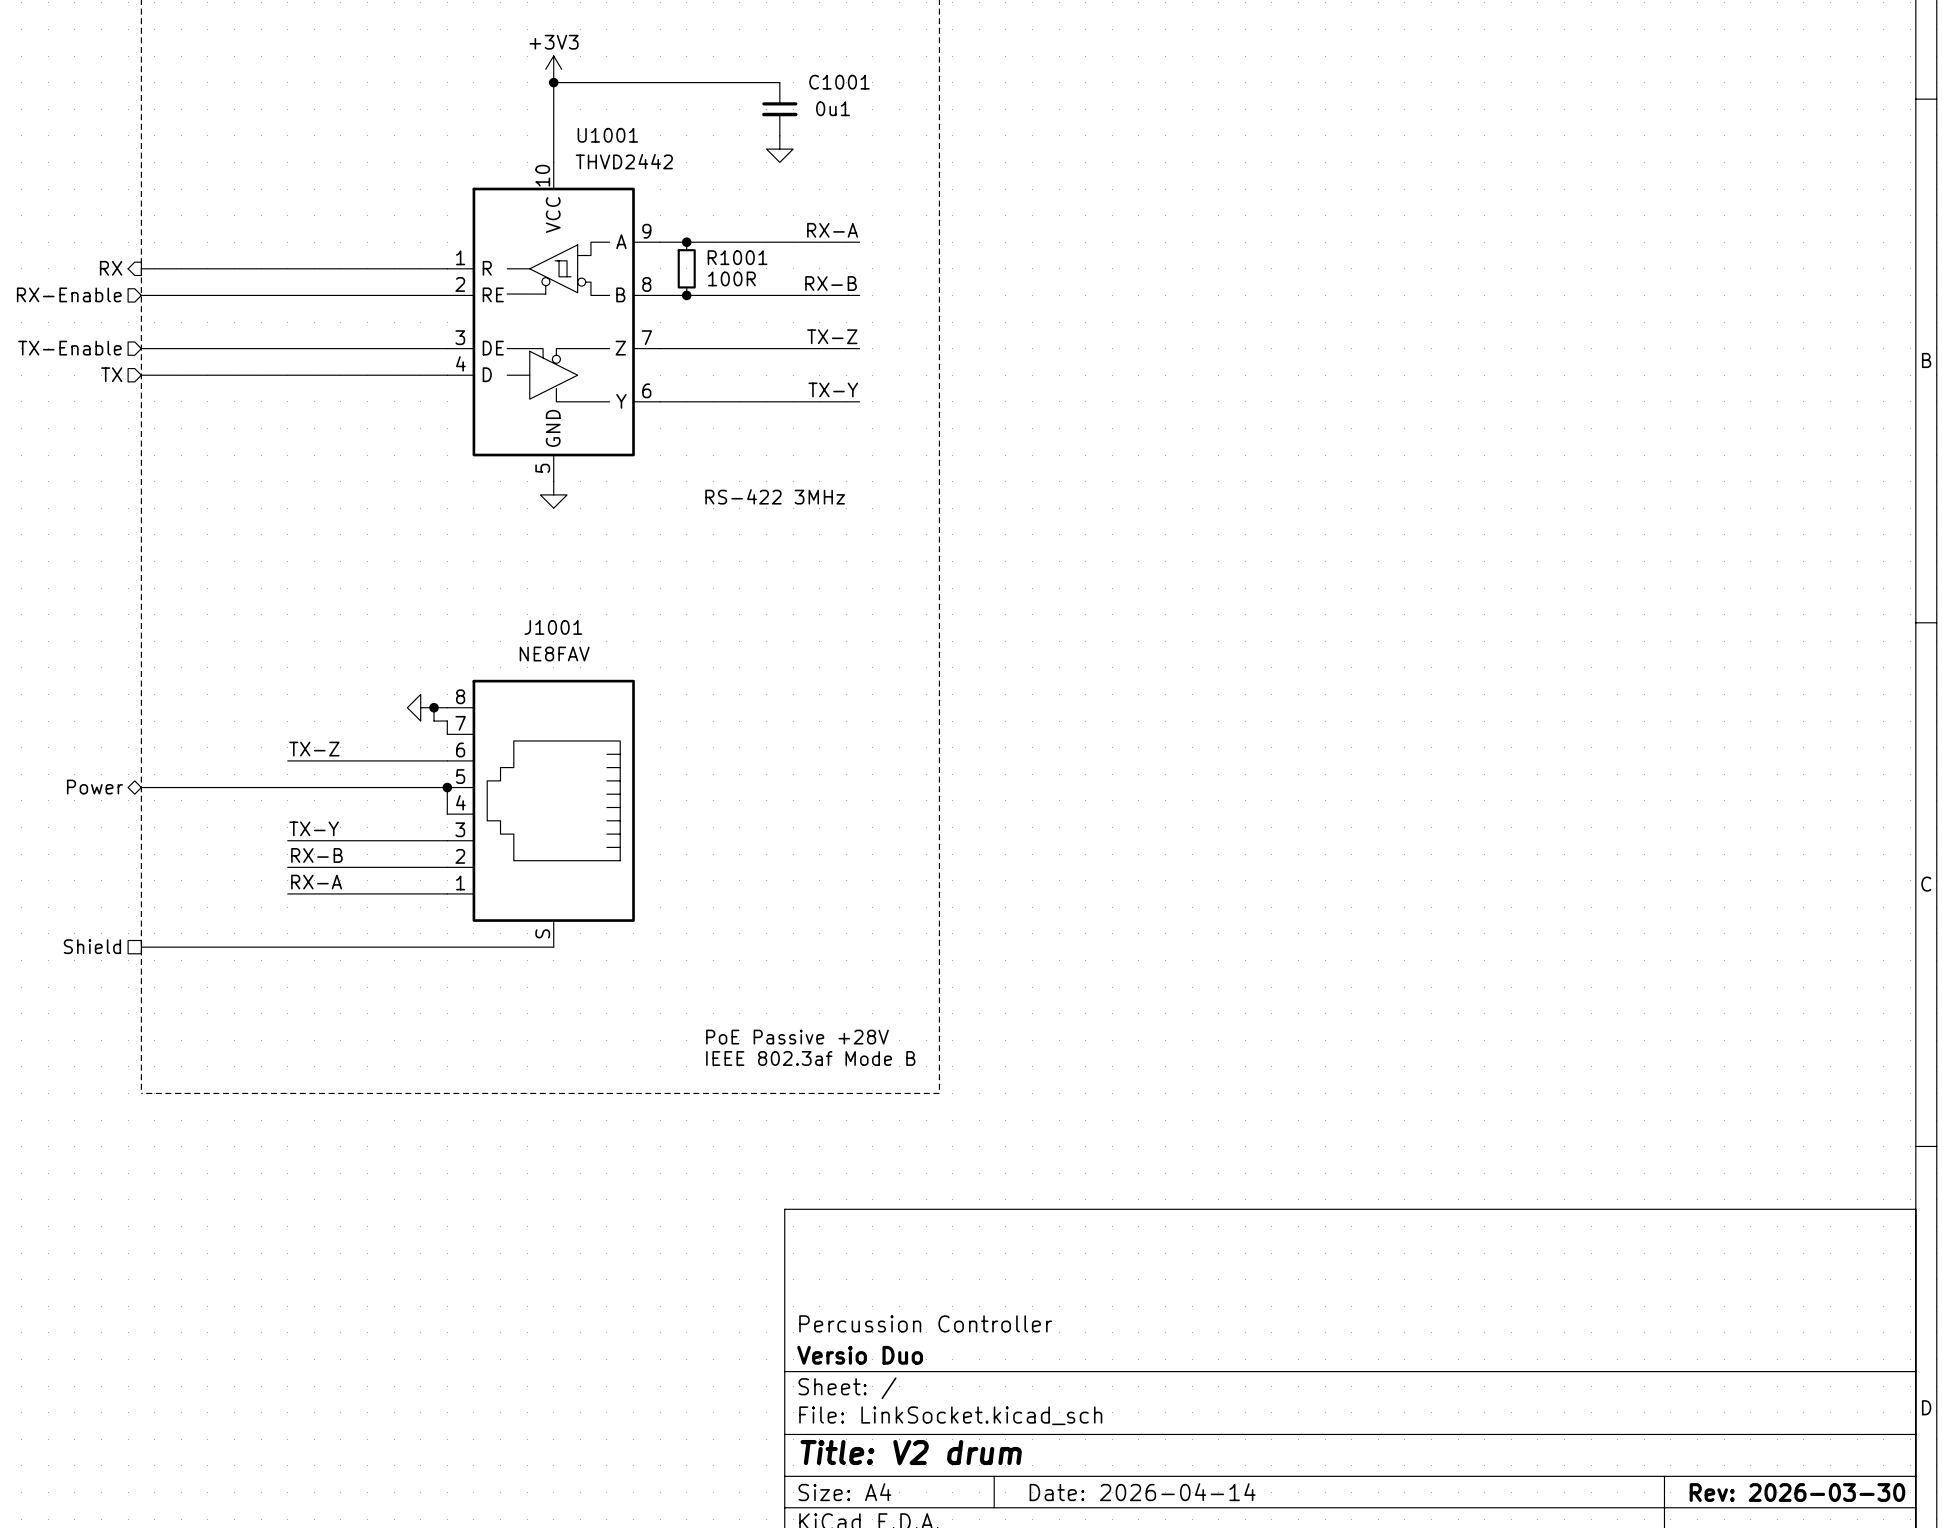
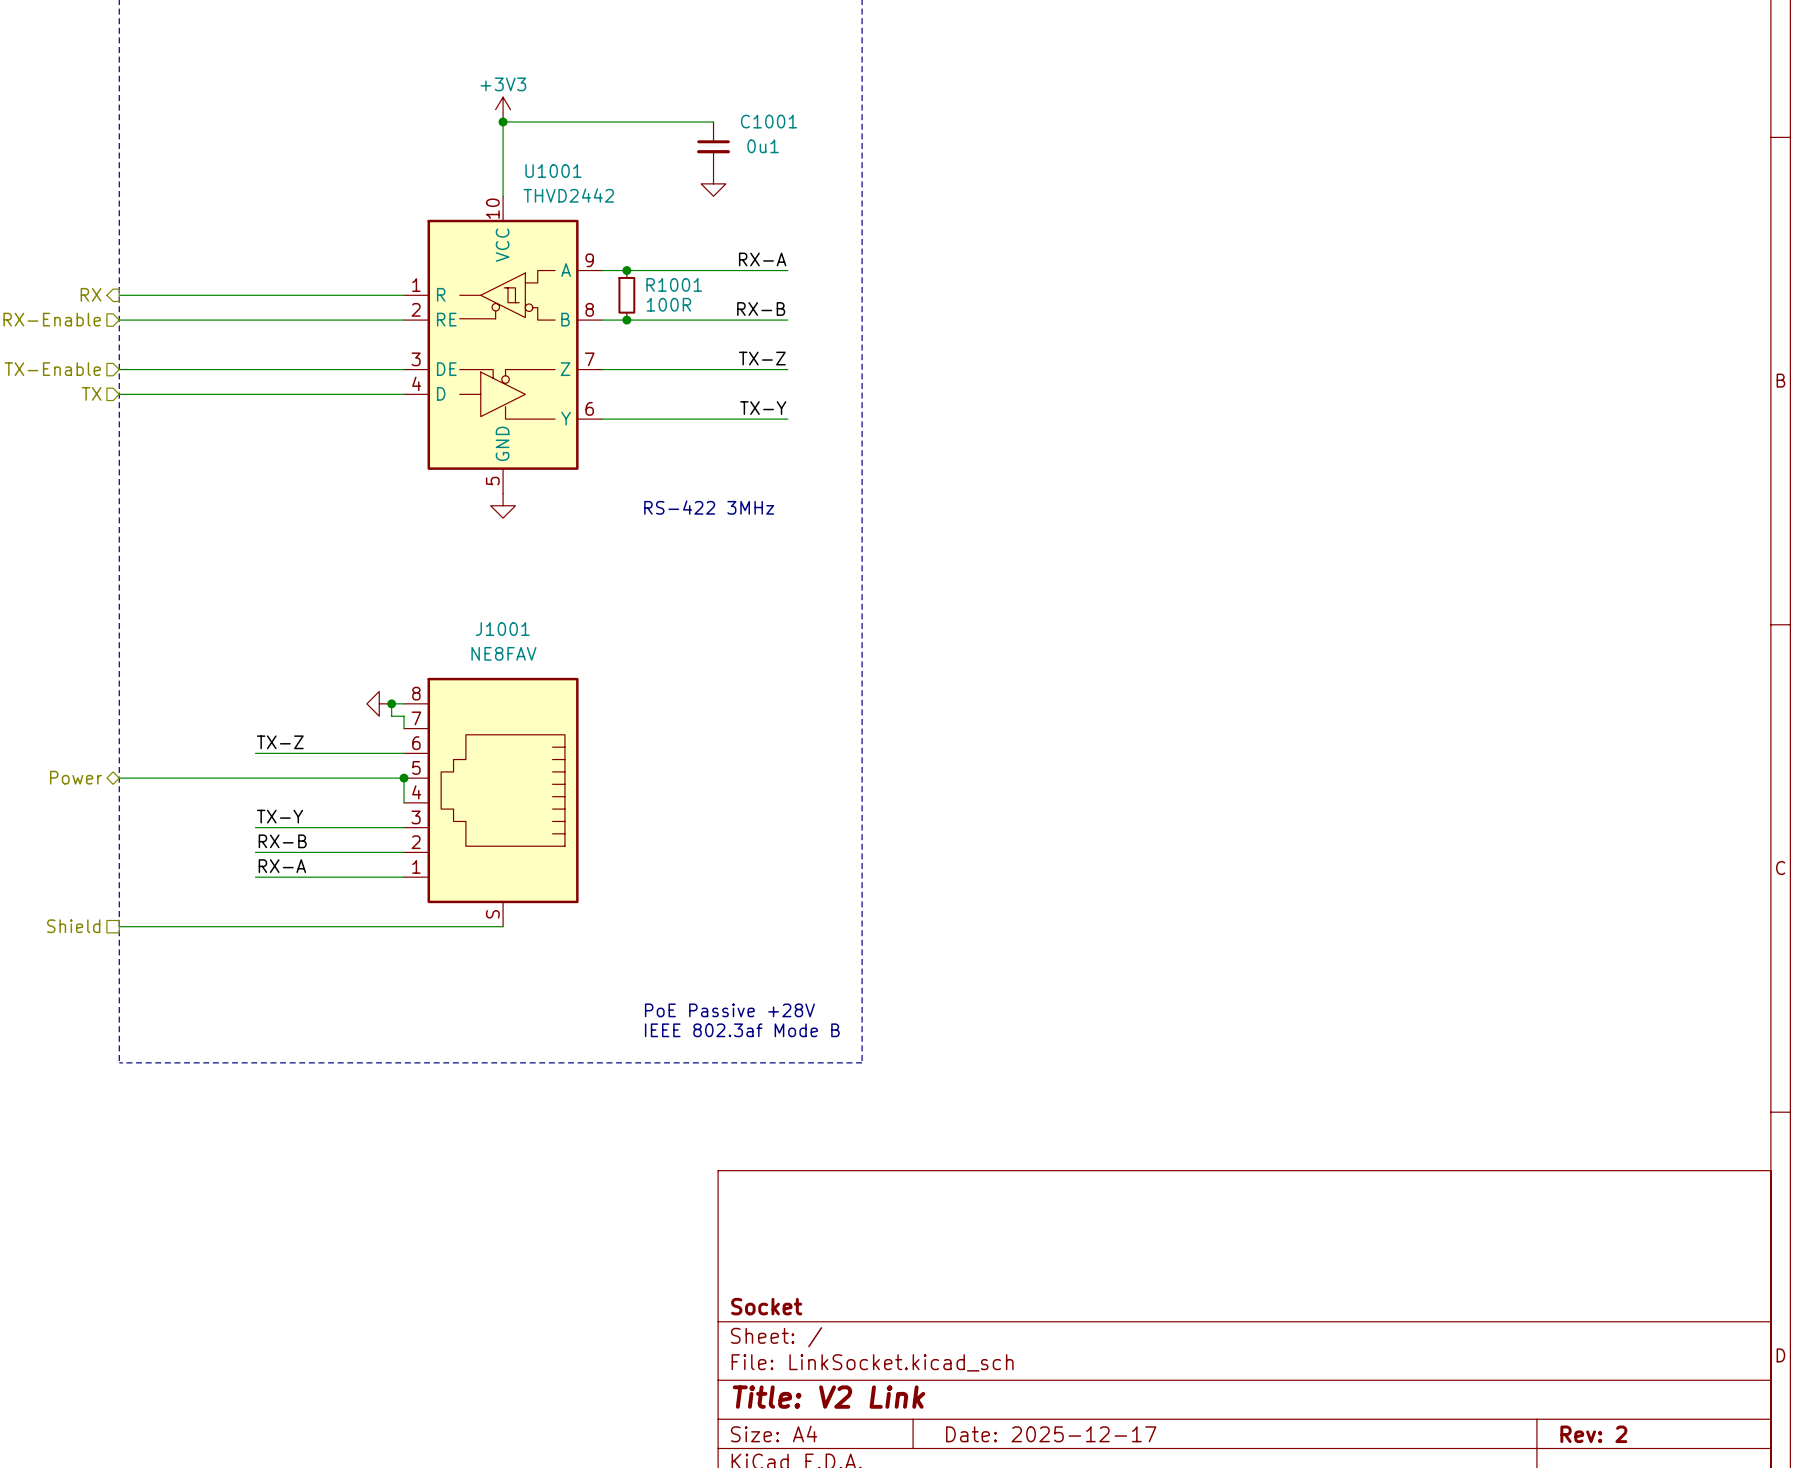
title block: Percussion Controller (925, 1323) -> none
title block: Versio Duo (860, 1355) -> Socket (766, 1306)
title block: Title: V2 drum (911, 1452) -> Title: V2 Link (829, 1397)
title block: Date: 2026-04-14 (1142, 1492) -> Date: 2025-12-17 (1051, 1434)
title block: Rev: 2026-03-30 (1797, 1492) -> Rev: 2 (1593, 1434)

